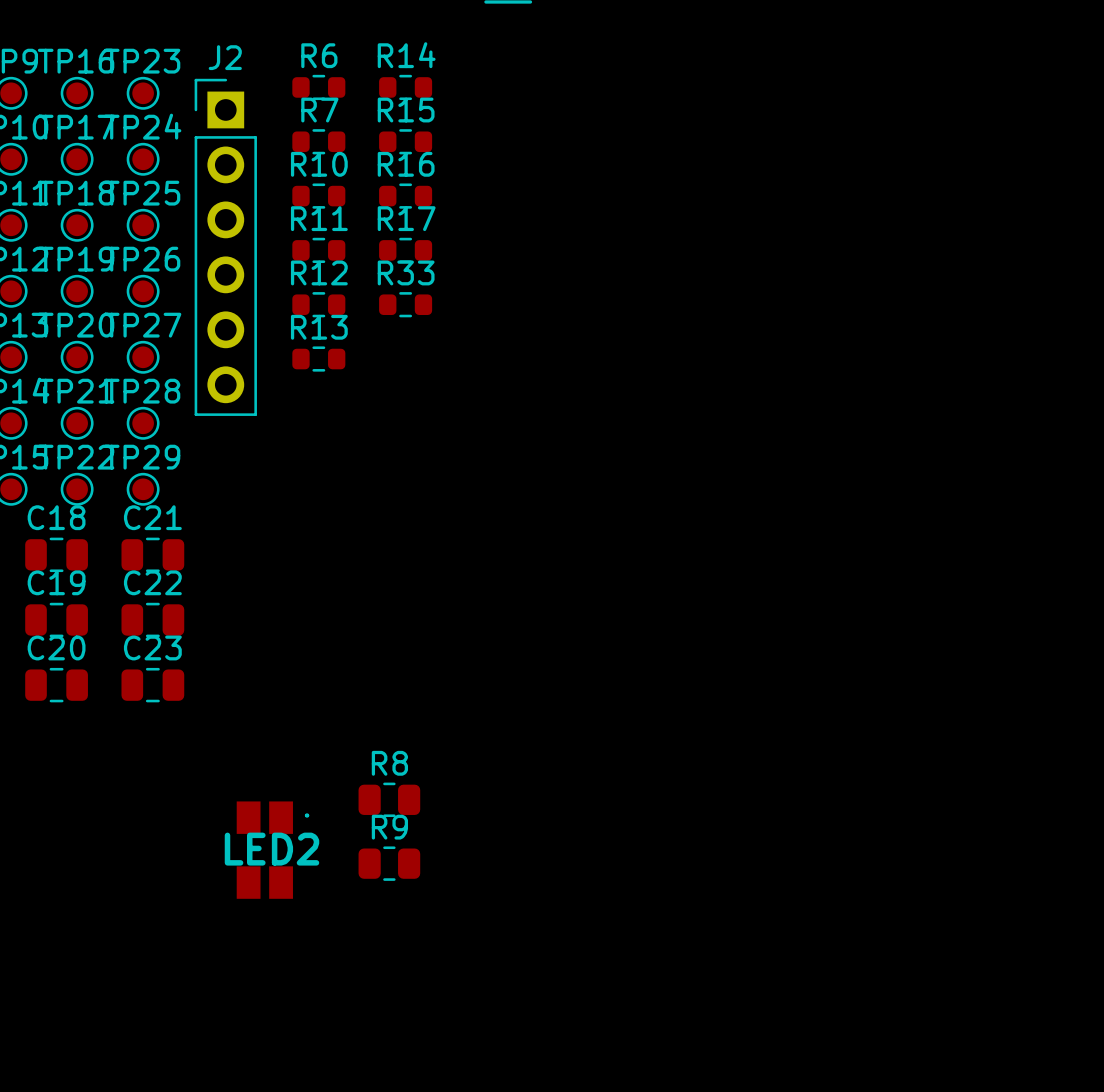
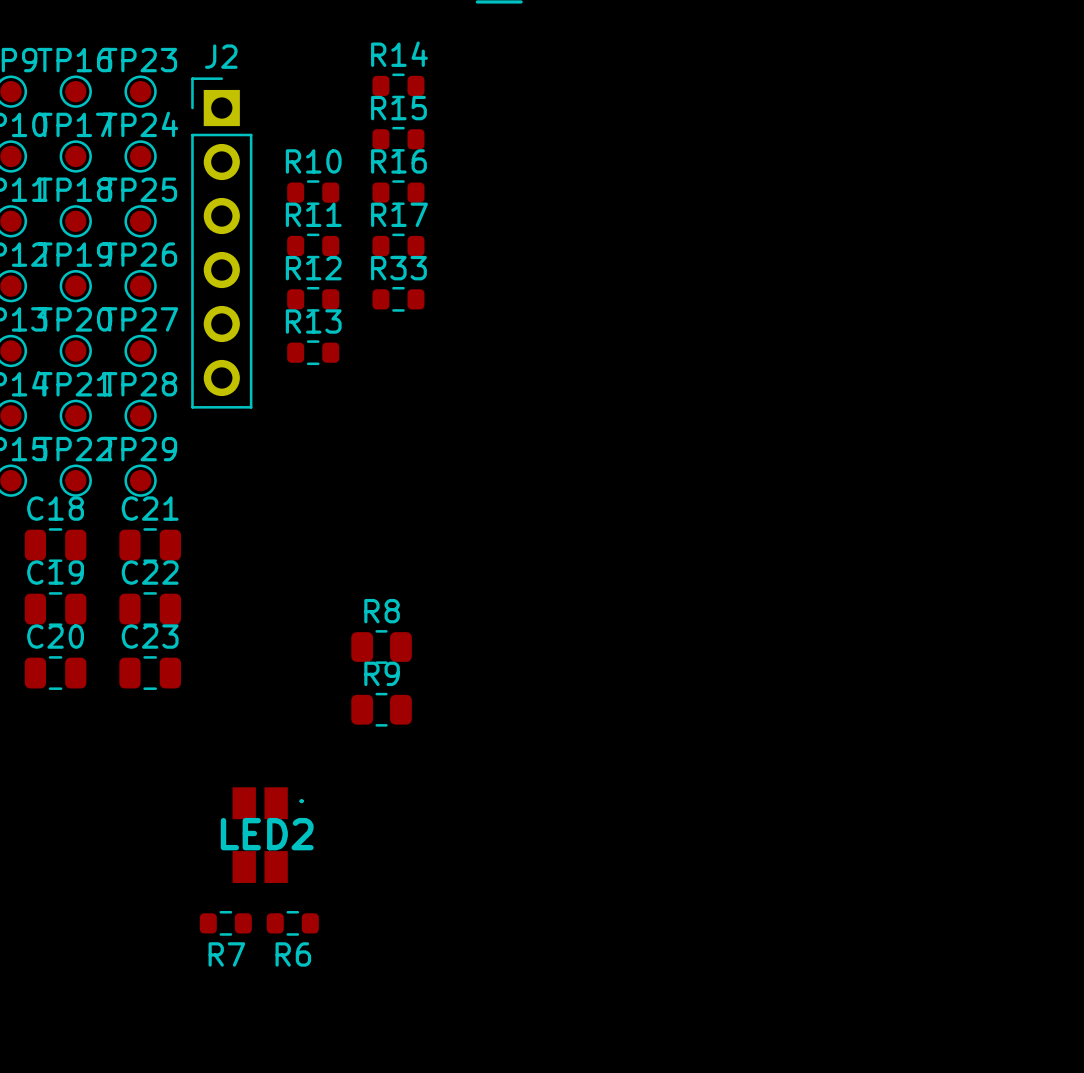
R6 name position: R6 (319, 55) -> R6 (293, 954)
R6 position: (318, 87) -> (292, 923)
R7 name position: R7 (319, 110) -> R7 (226, 954)
R7 position: (318, 141) -> (225, 923)
R8 position: (389, 799) -> (381, 647)
R9 position: (389, 863) -> (381, 709)

